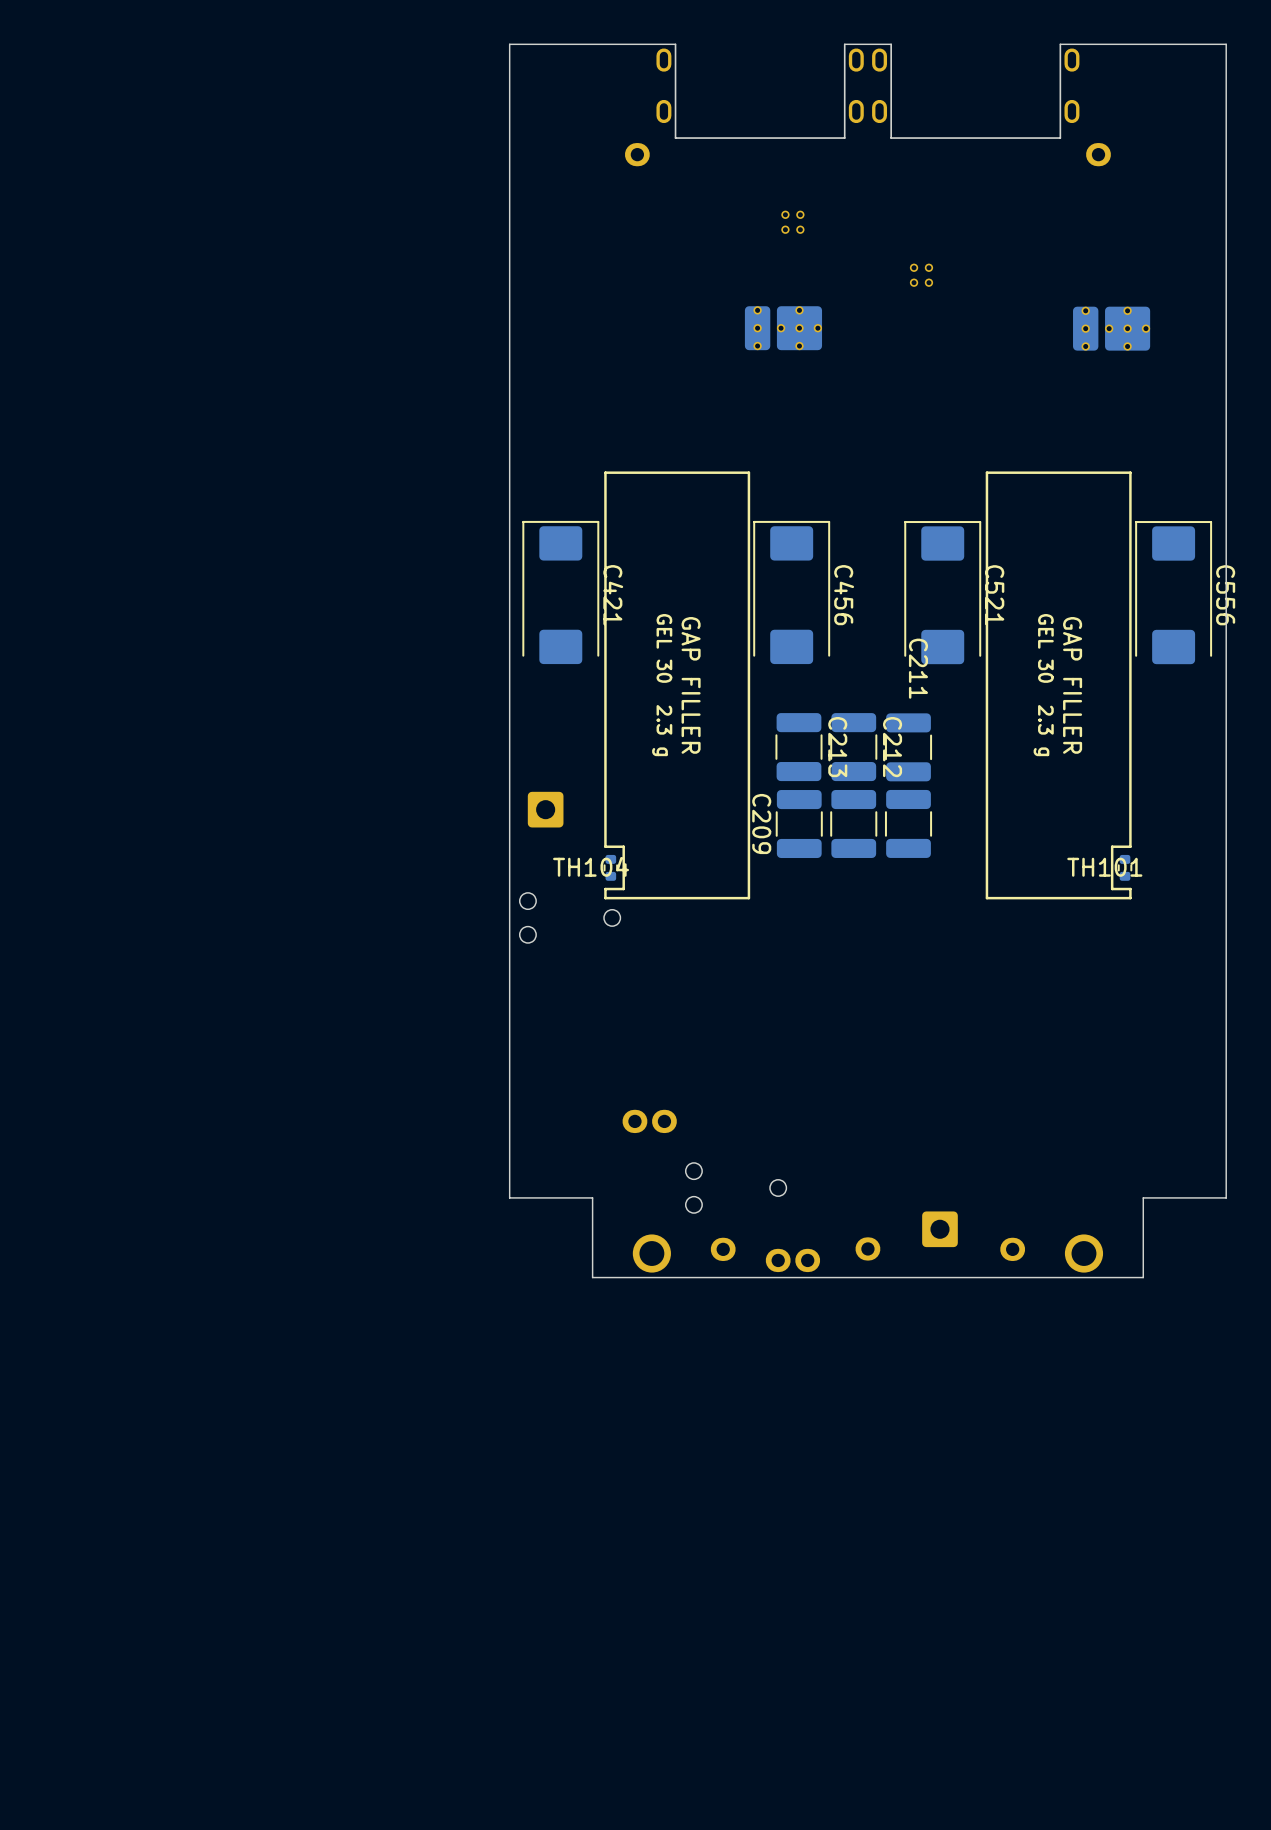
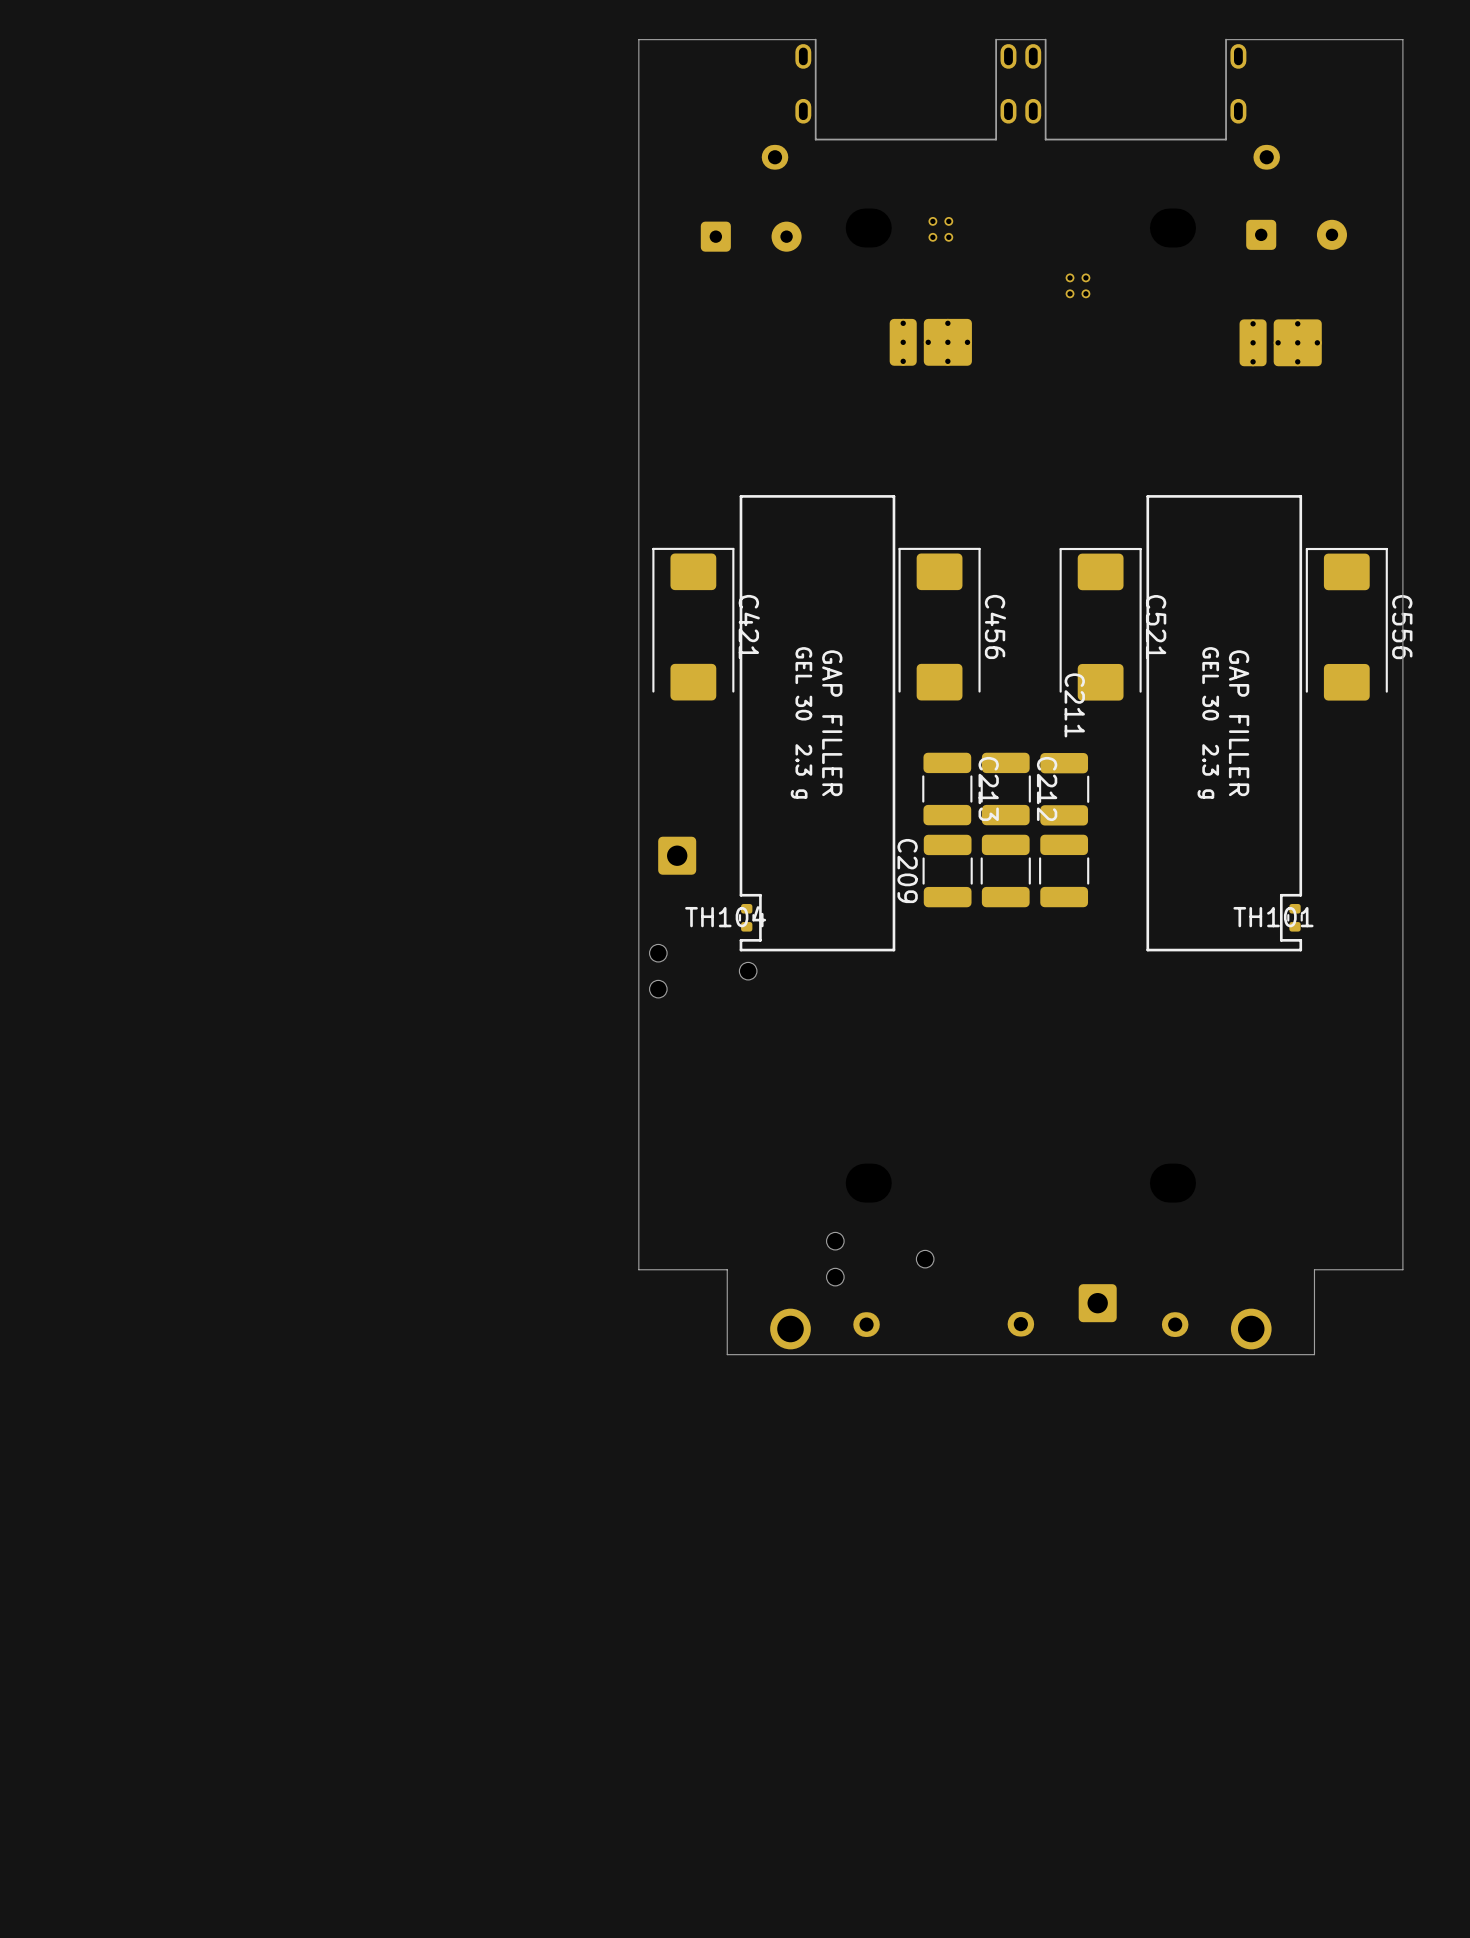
part: none -> (1296, 234)
part: none -> (751, 236)
part: (634, 1121) -> none
part: (664, 1121) -> none
part: (778, 1260) -> none
part: (807, 1260) -> none

